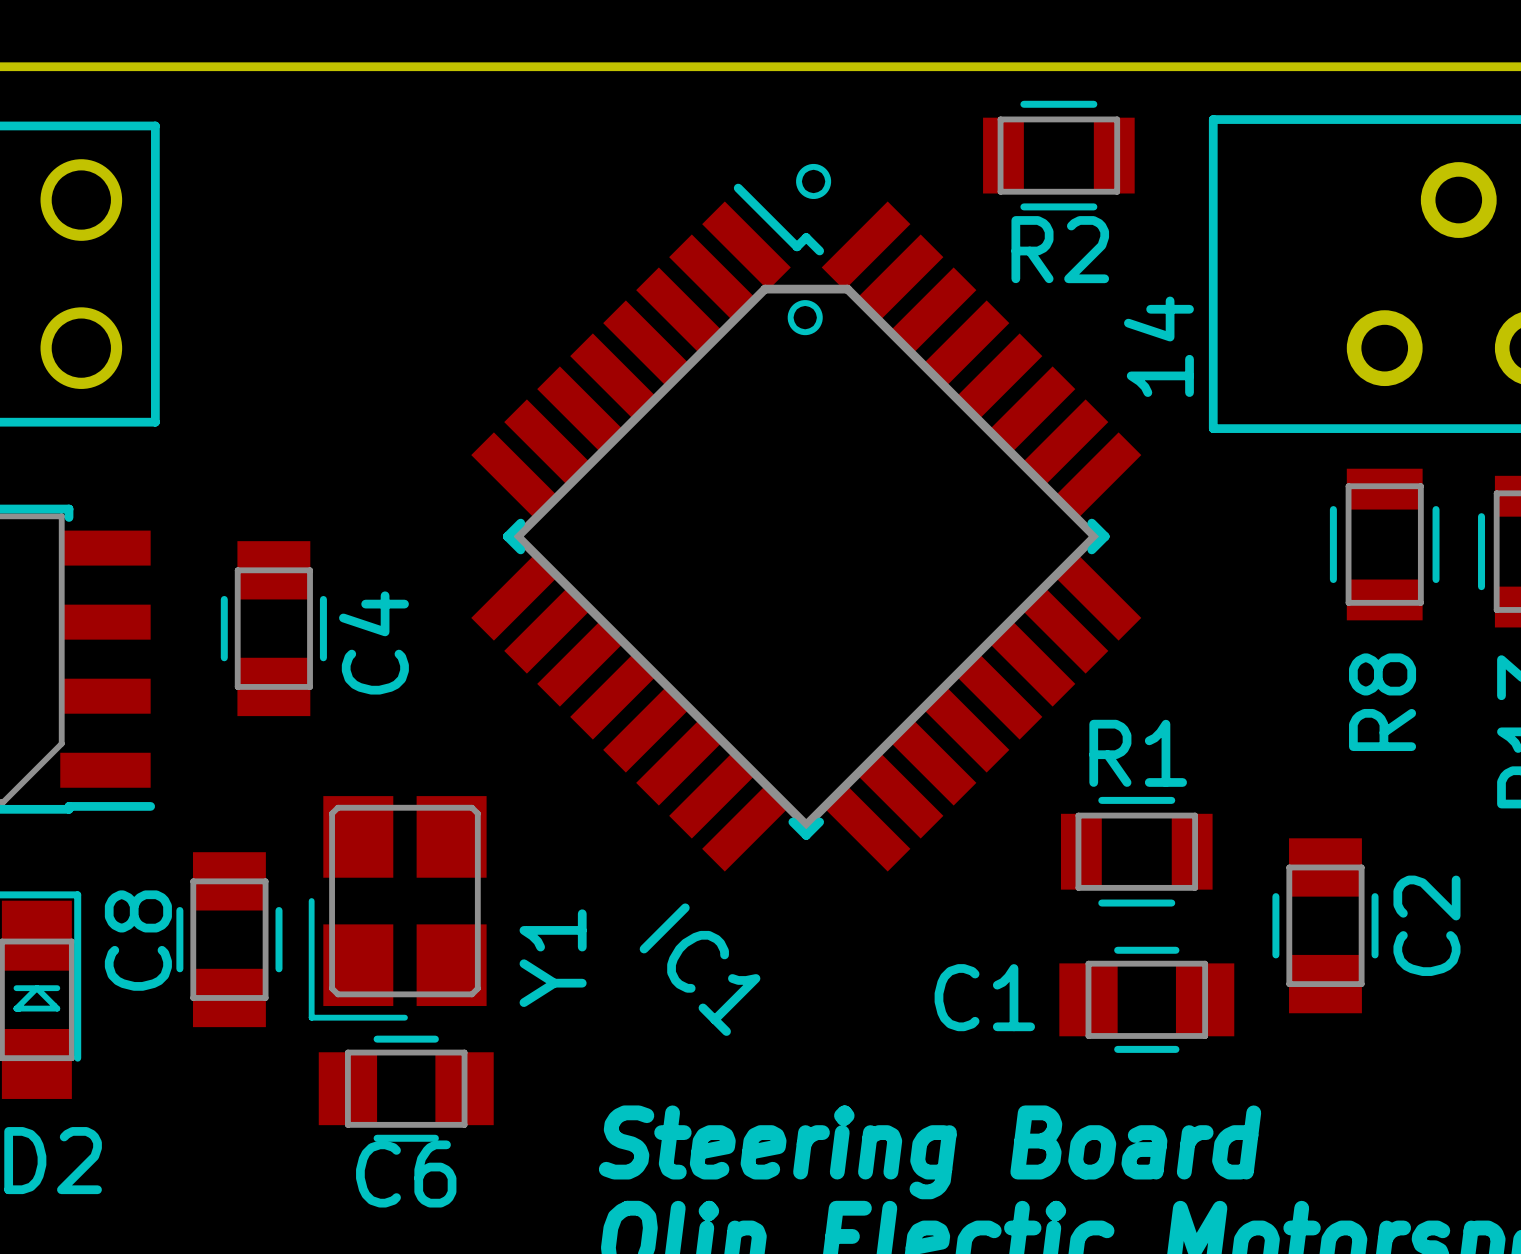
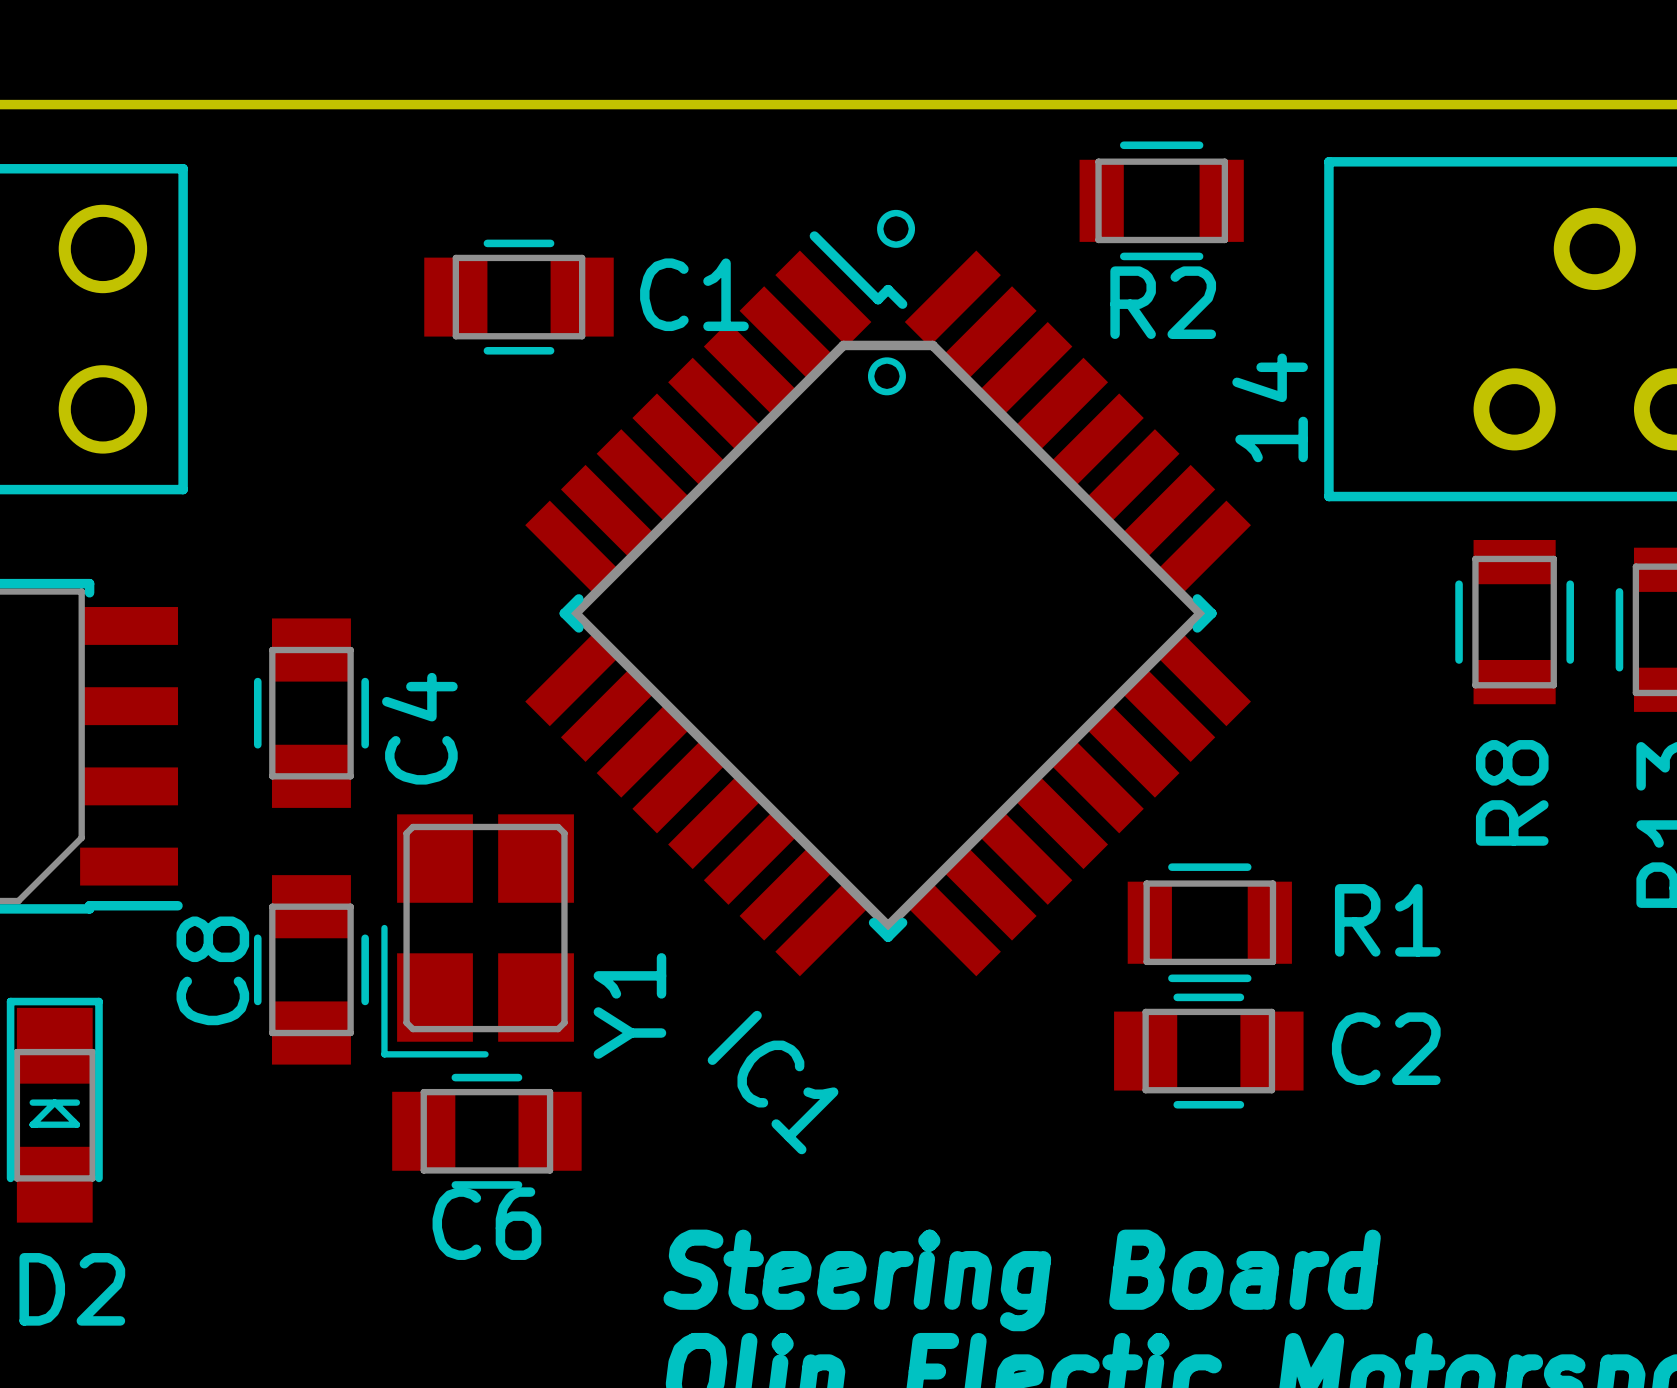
R1 name position: R1 (1138, 753) -> R1 (1387, 920)
R1 position: (1136, 851) -> (1209, 922)
Y1 position: (397, 908) -> (477, 935)
C2 rotation: 0° (1325, 925) -> 90° clockwise (1208, 1051)
C2 position: (1325, 925) -> (1208, 1051)
C8 position: (229, 939) -> (311, 969)
Y1 name position: Y1 (553, 958) -> Y1 (629, 1005)
C1 name position: C1 (984, 997) -> C1 (694, 294)
C1 position: (1146, 999) -> (519, 297)
C6 position: (406, 1088) -> (486, 1131)

